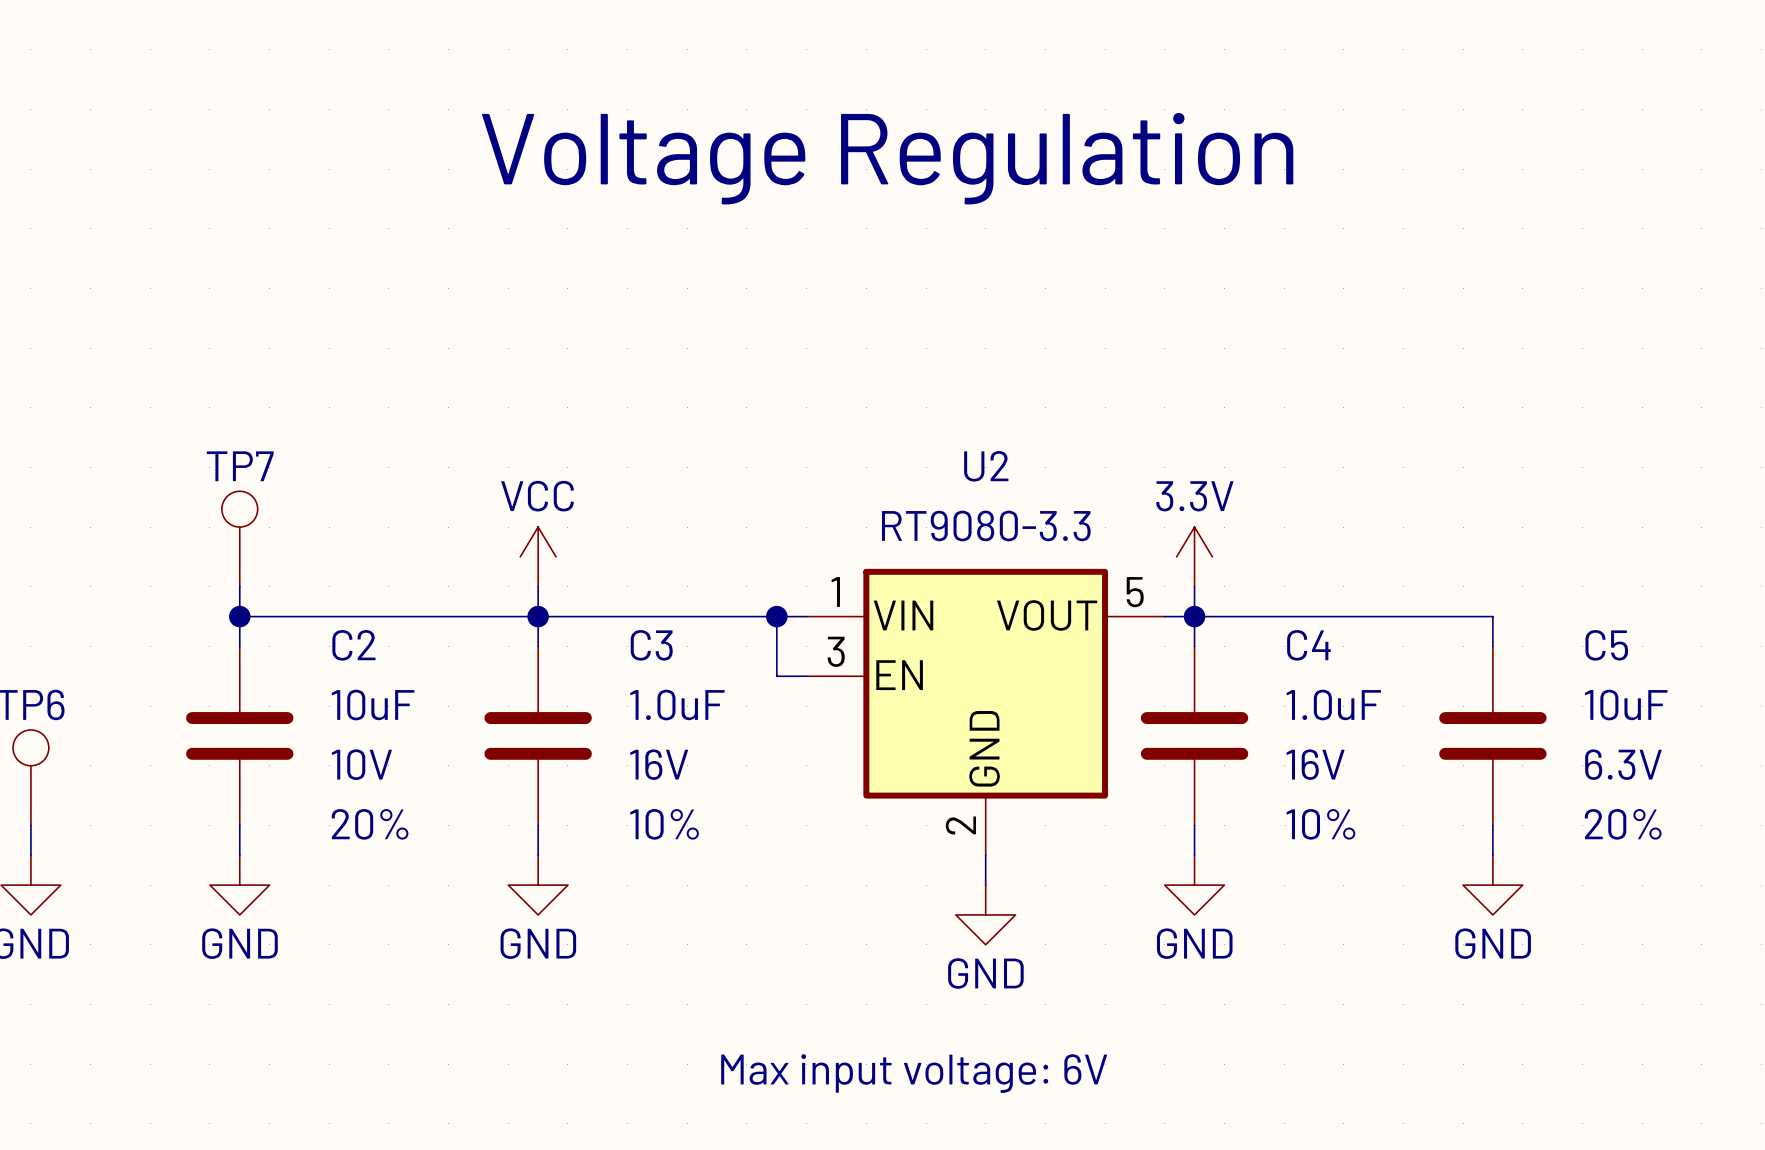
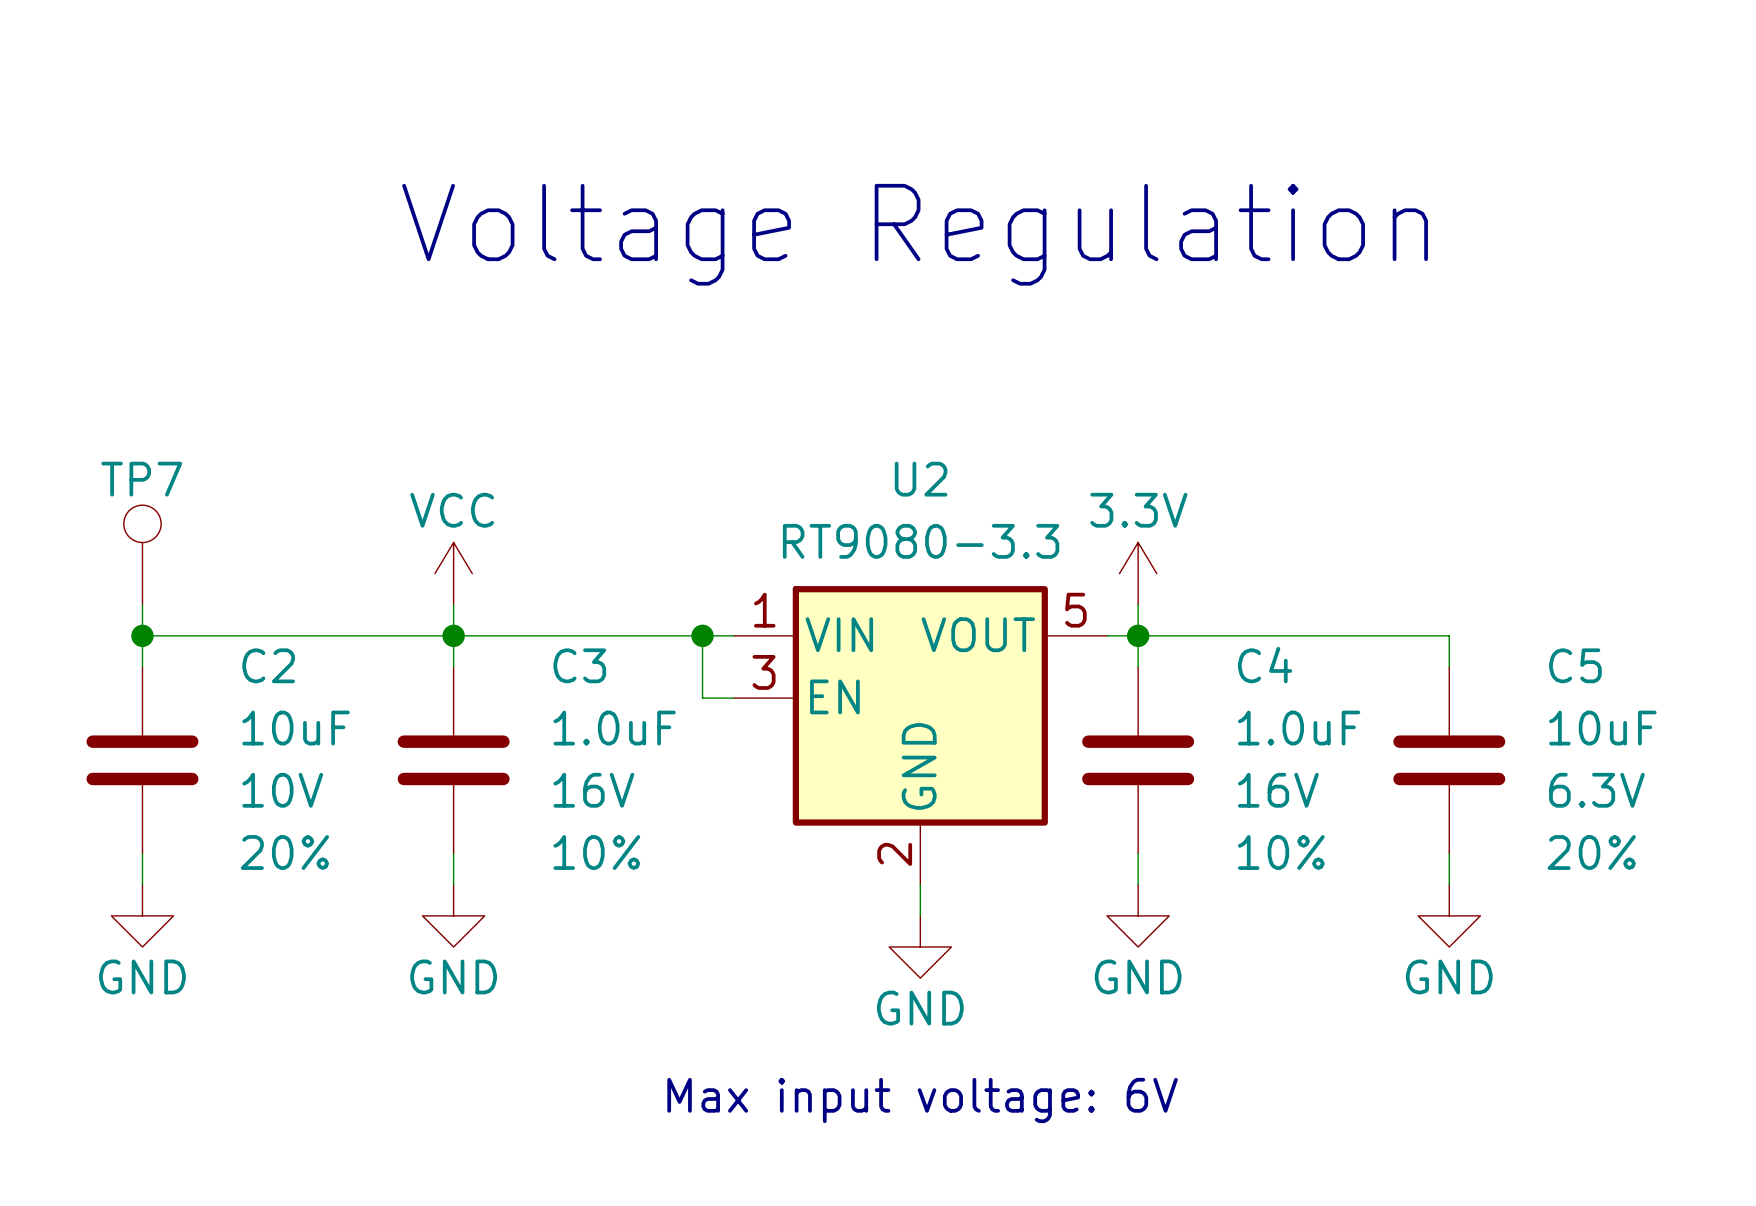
text position: Voltage Regulation (887, 158) -> Voltage Regulation (915, 234)
text position: Max input voltage: 6V (914, 1073) -> Max input voltage: 6V (922, 1100)

